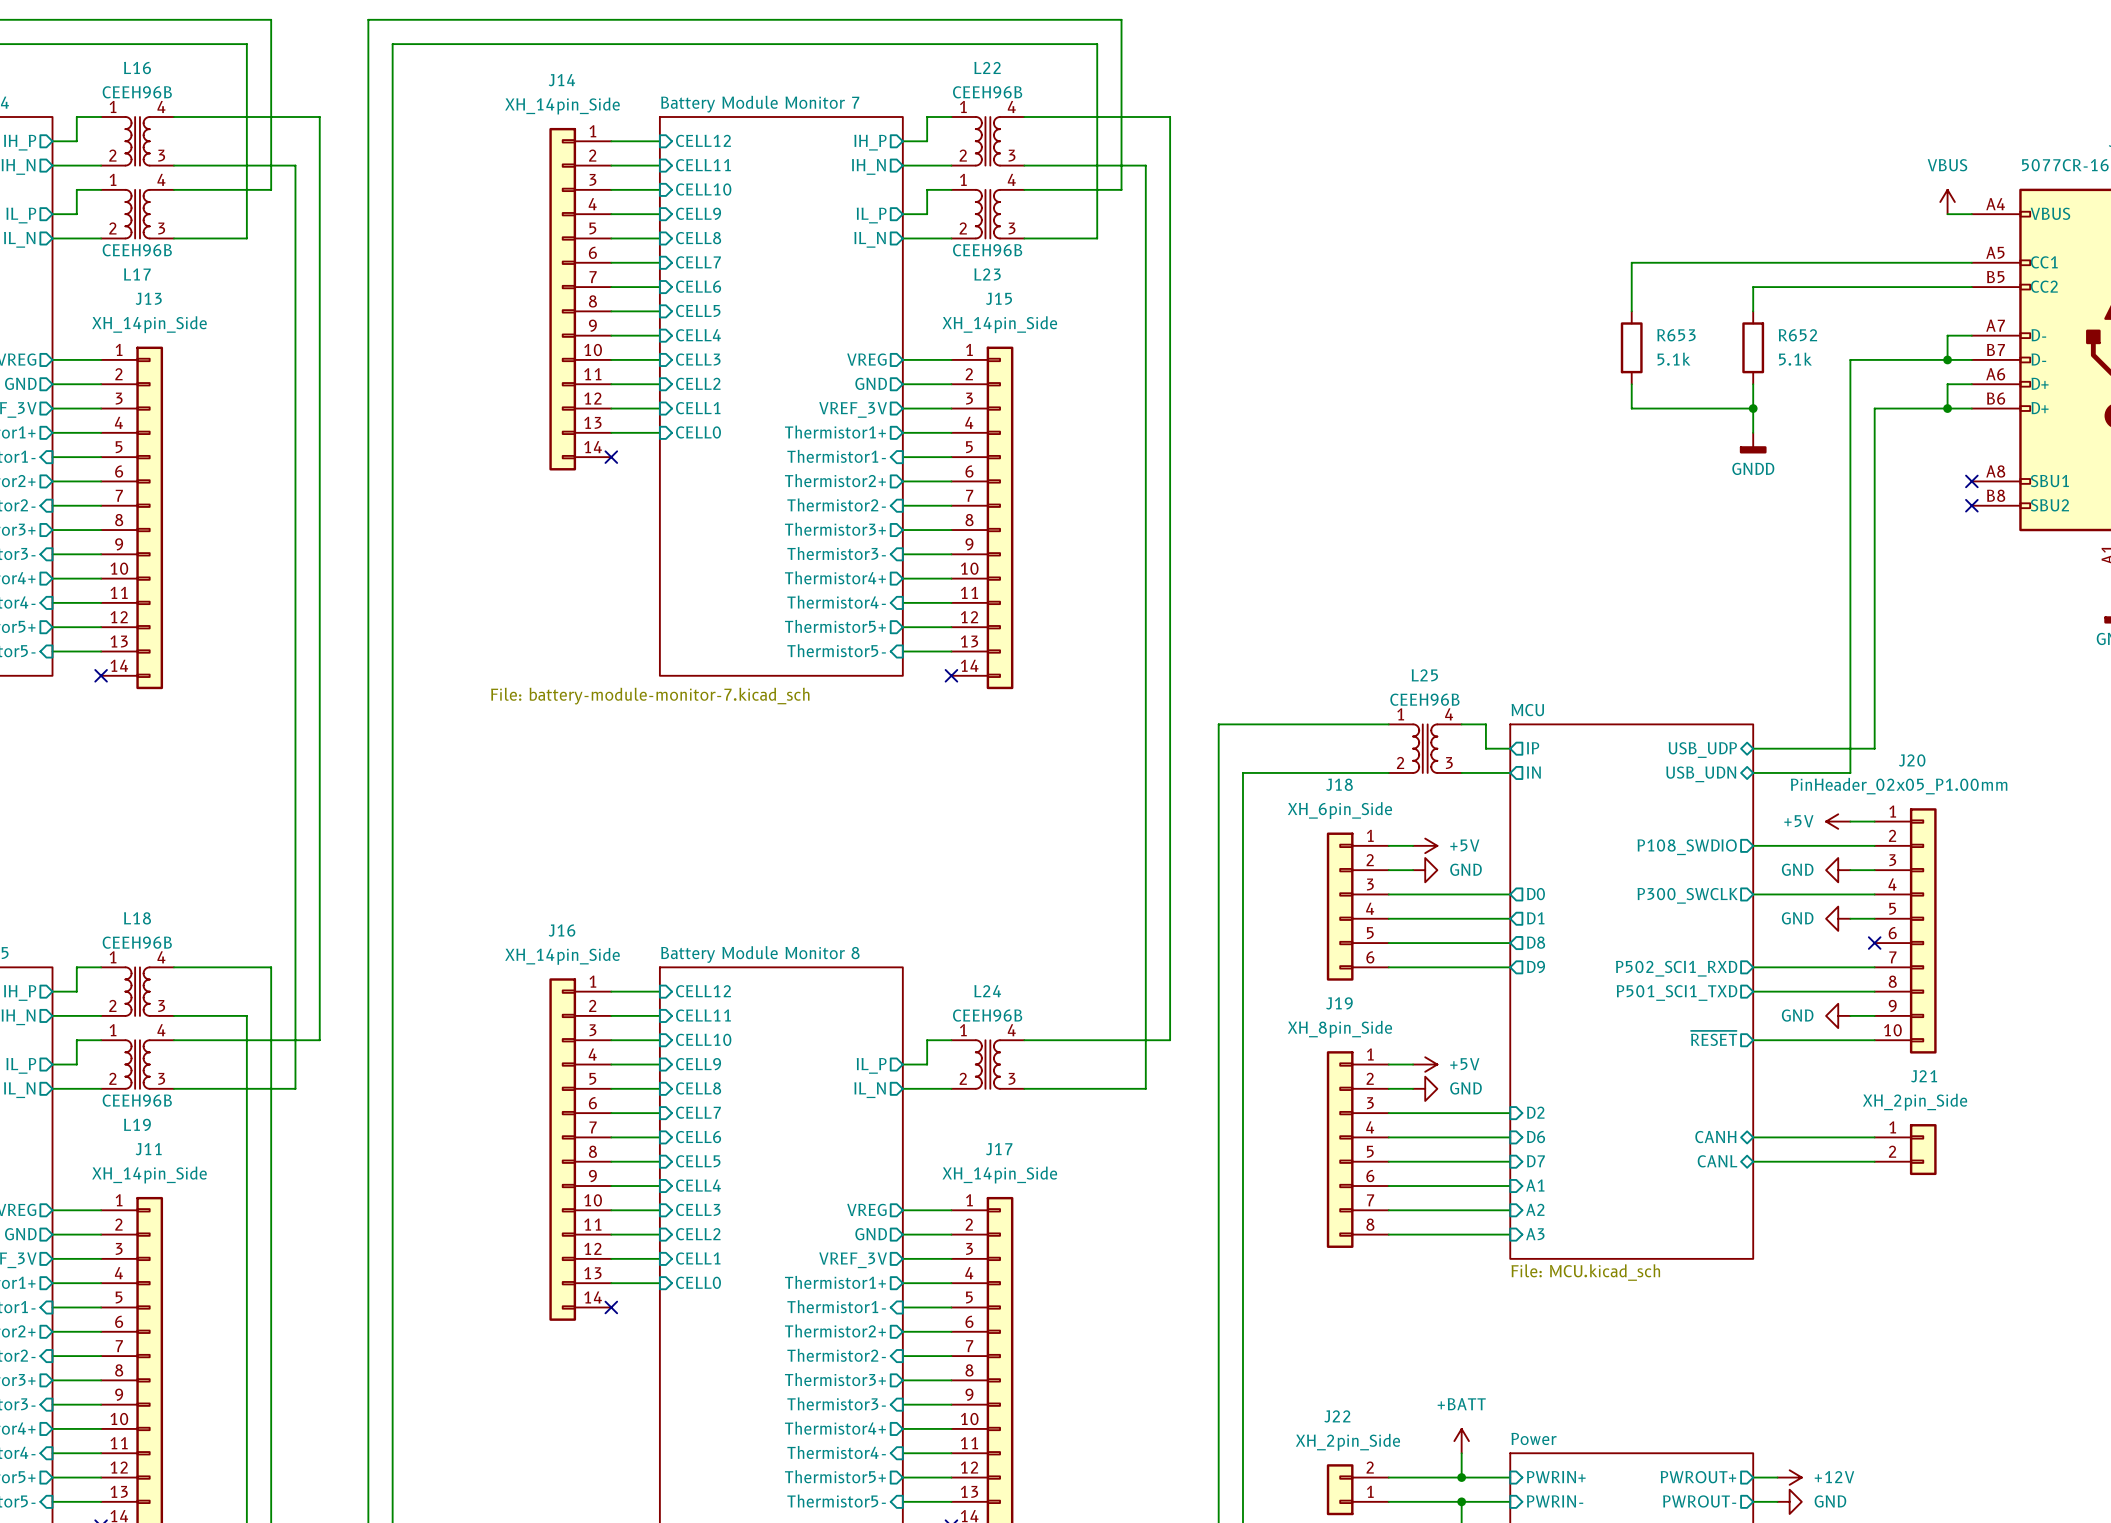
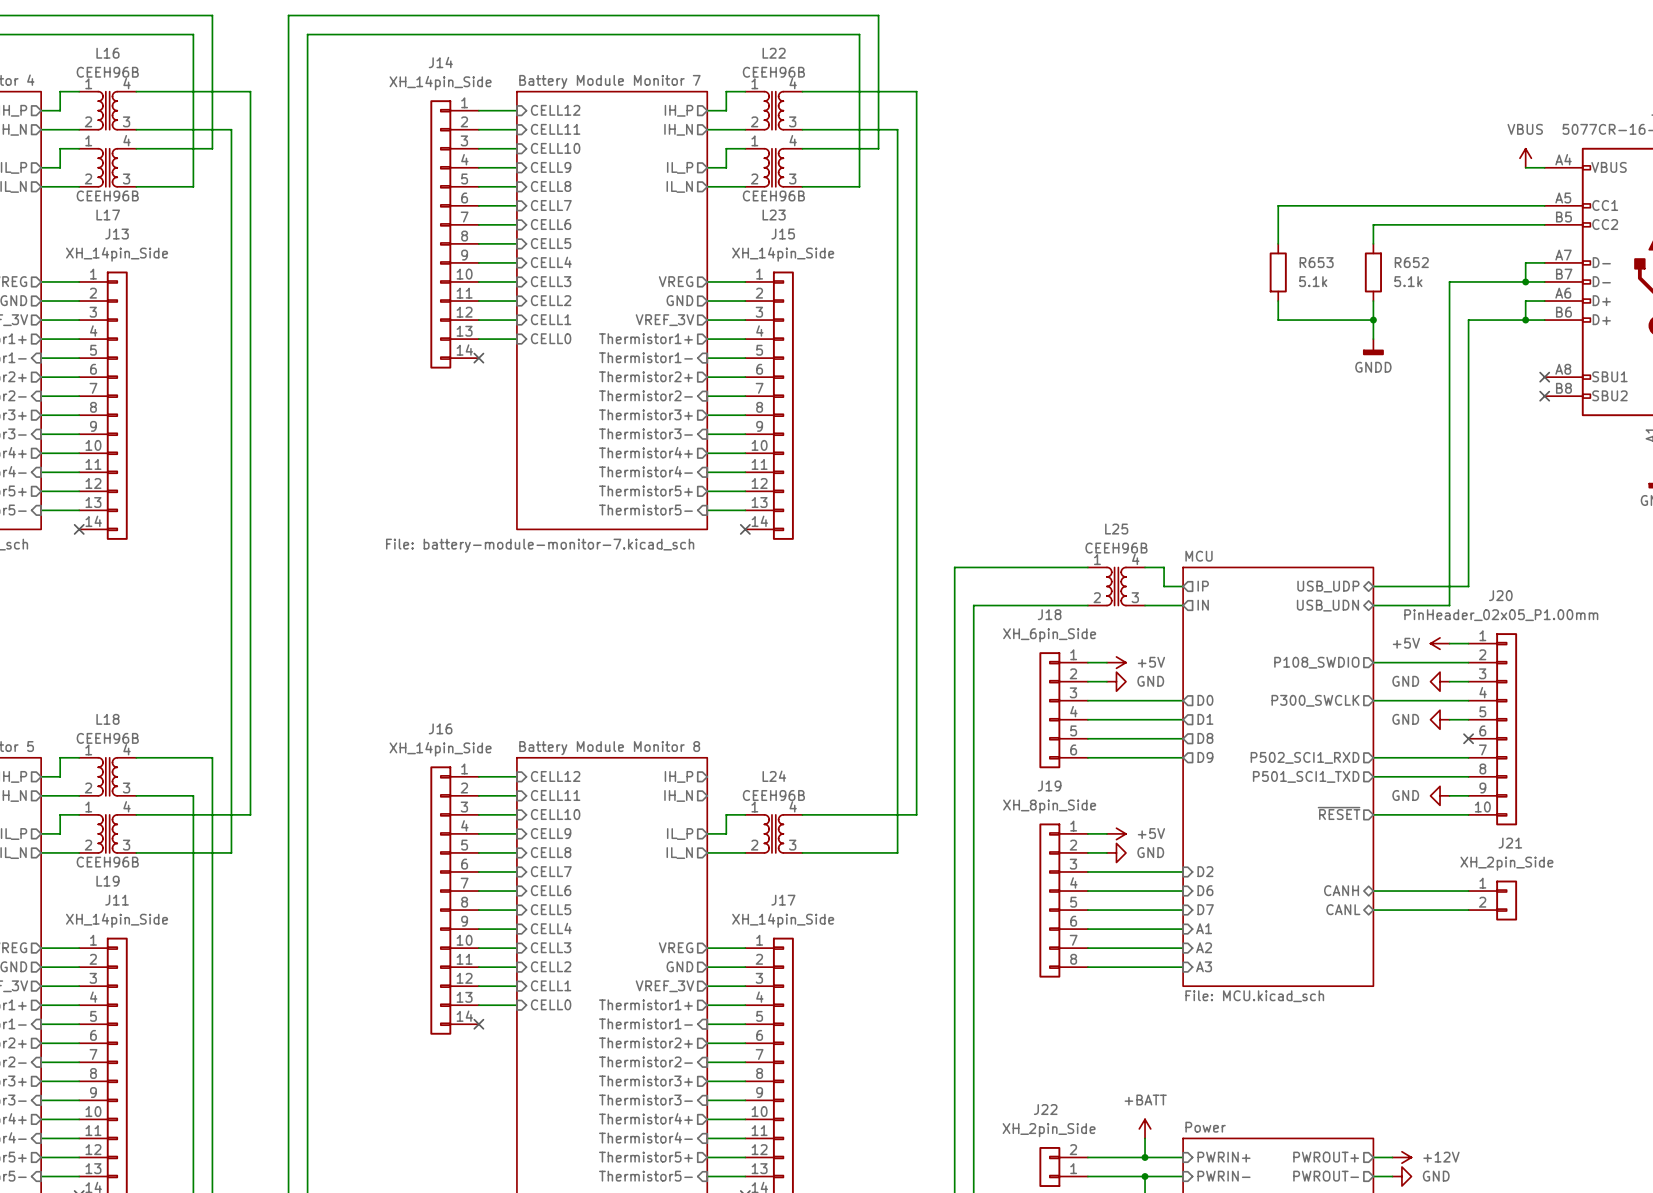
sheet pin: none -> IH_P (679, 776)
sheet pin: none -> IH_N (678, 795)

